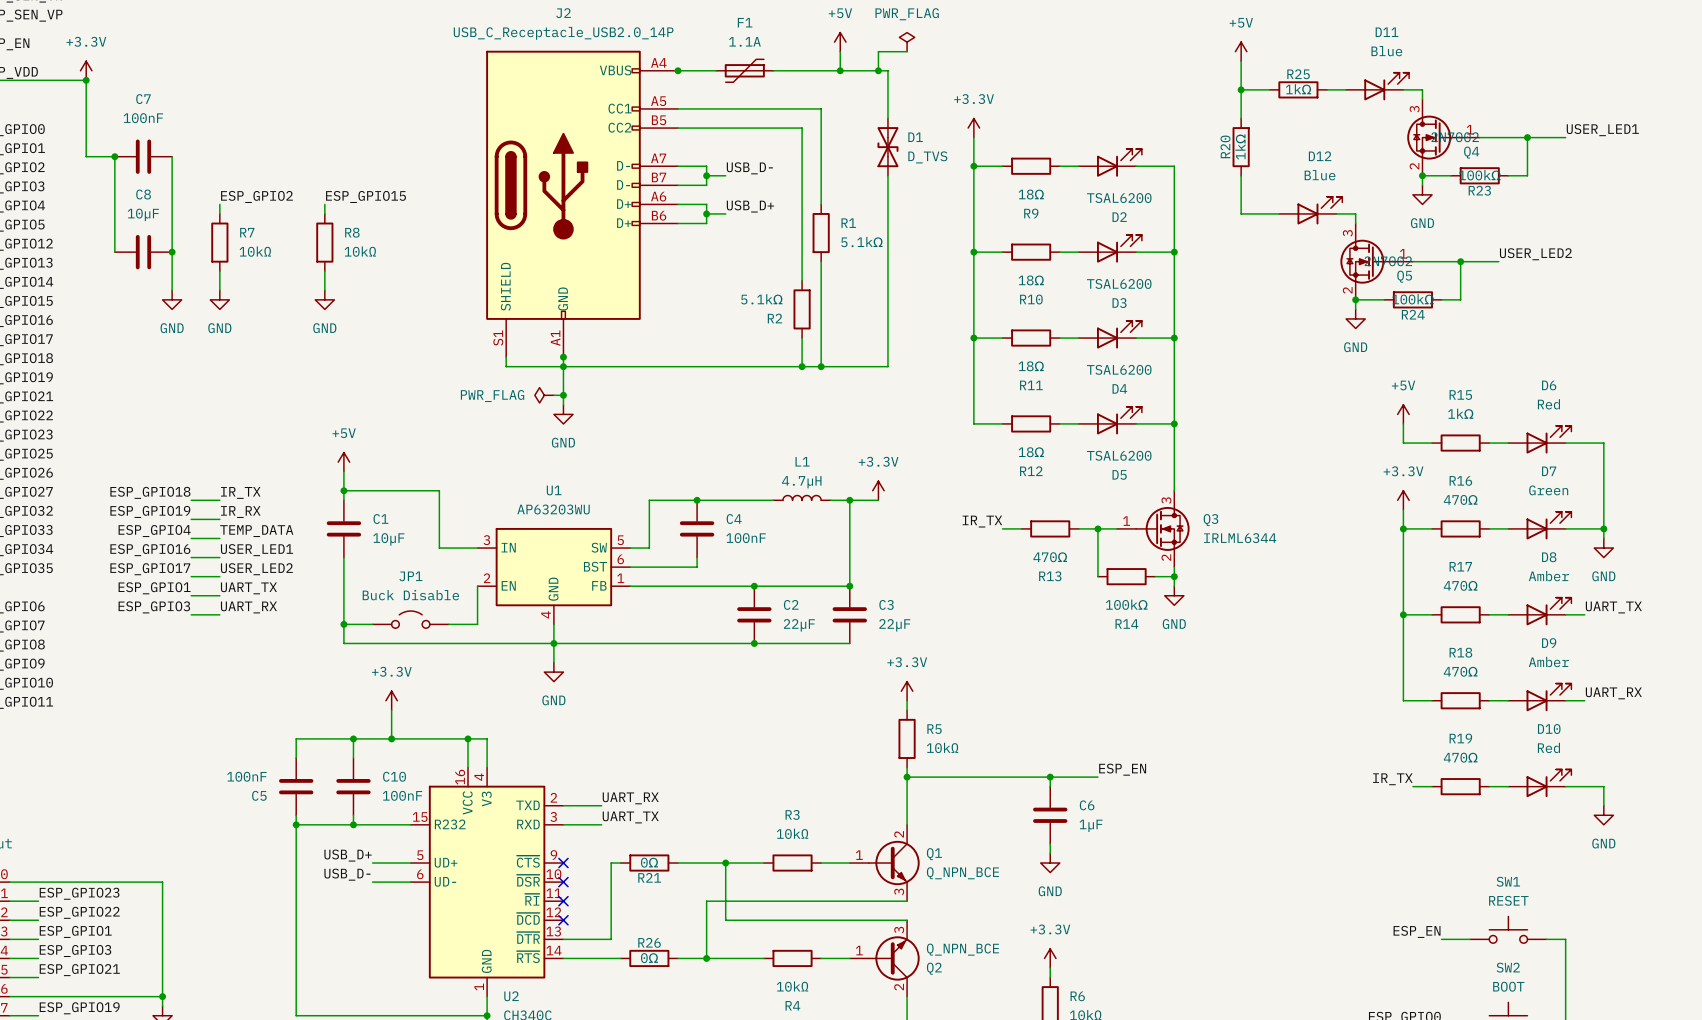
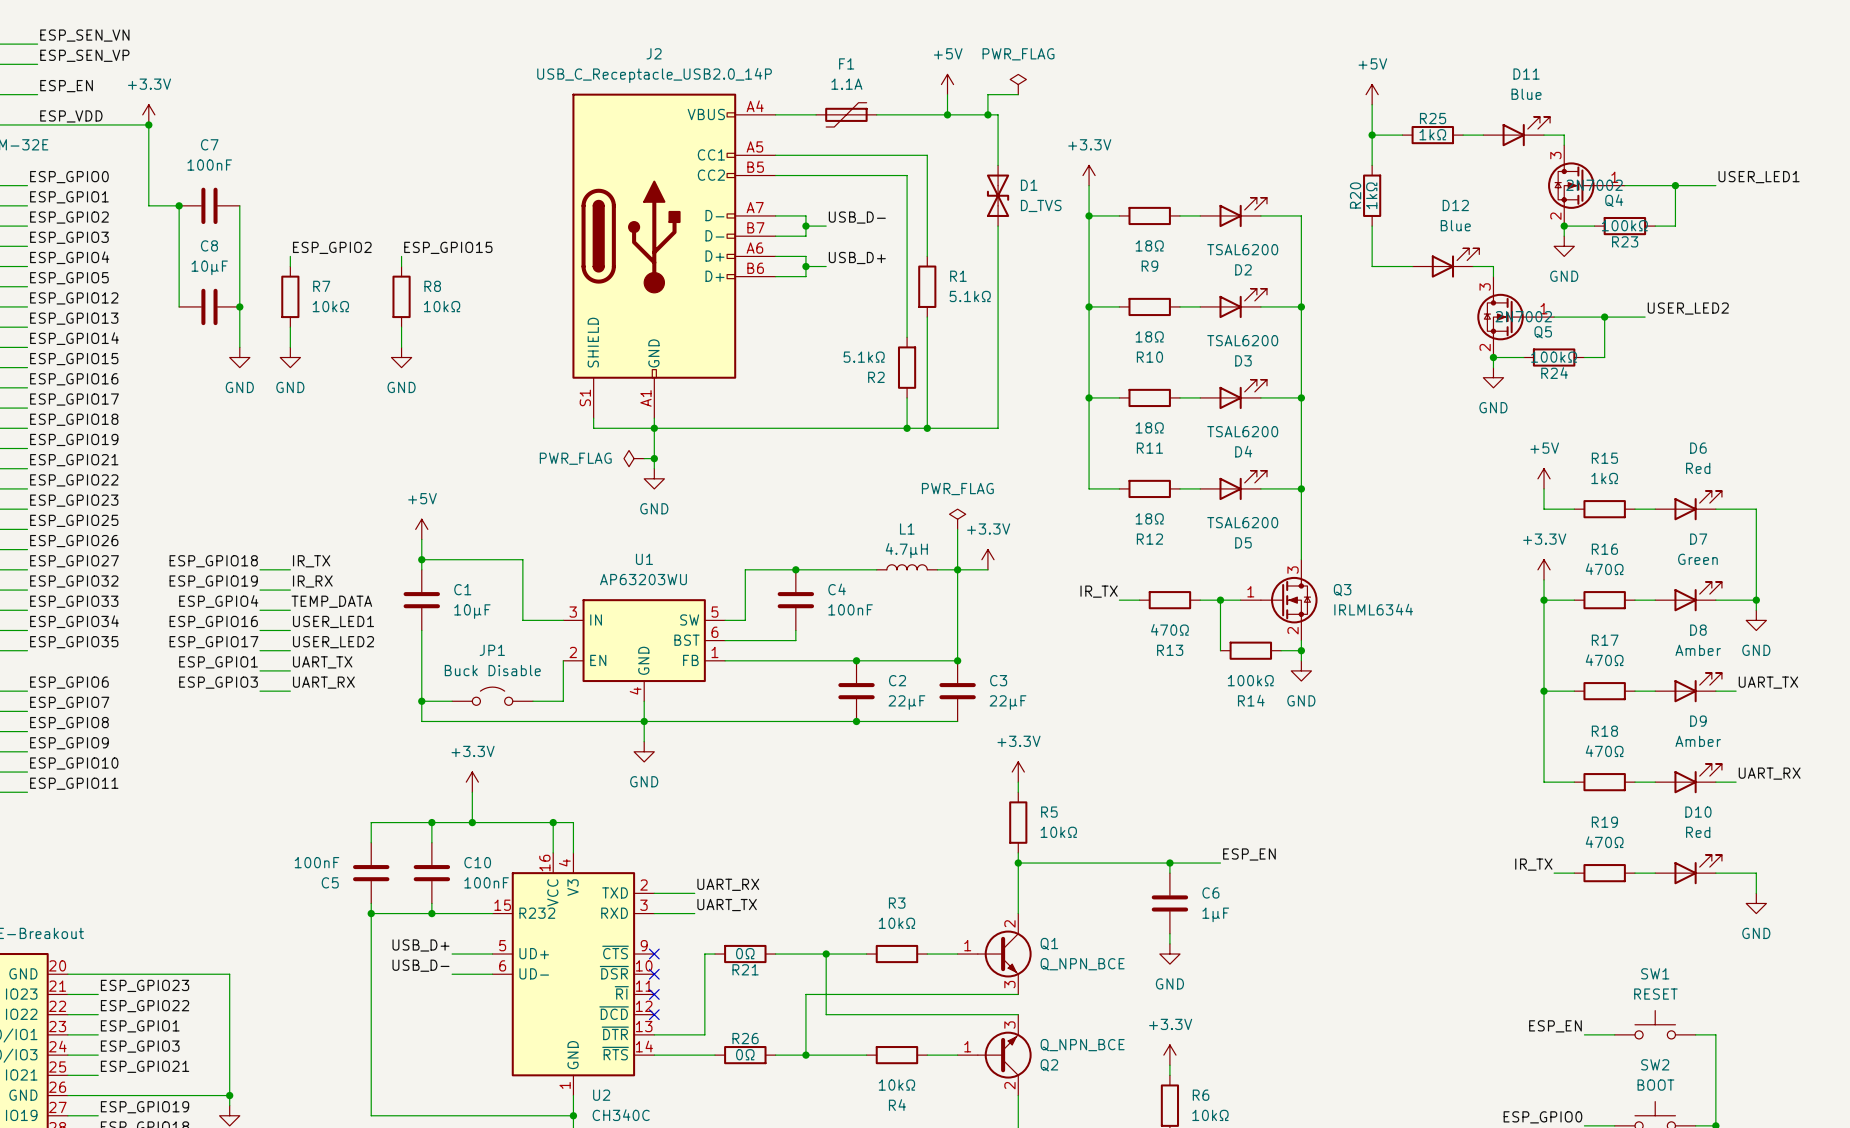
junction: (677, 70) -> none
junction: (563, 357) -> none
power symbol: none -> PWR_FLAG (957, 519)
wire: none -> (957, 529) (957, 569)

